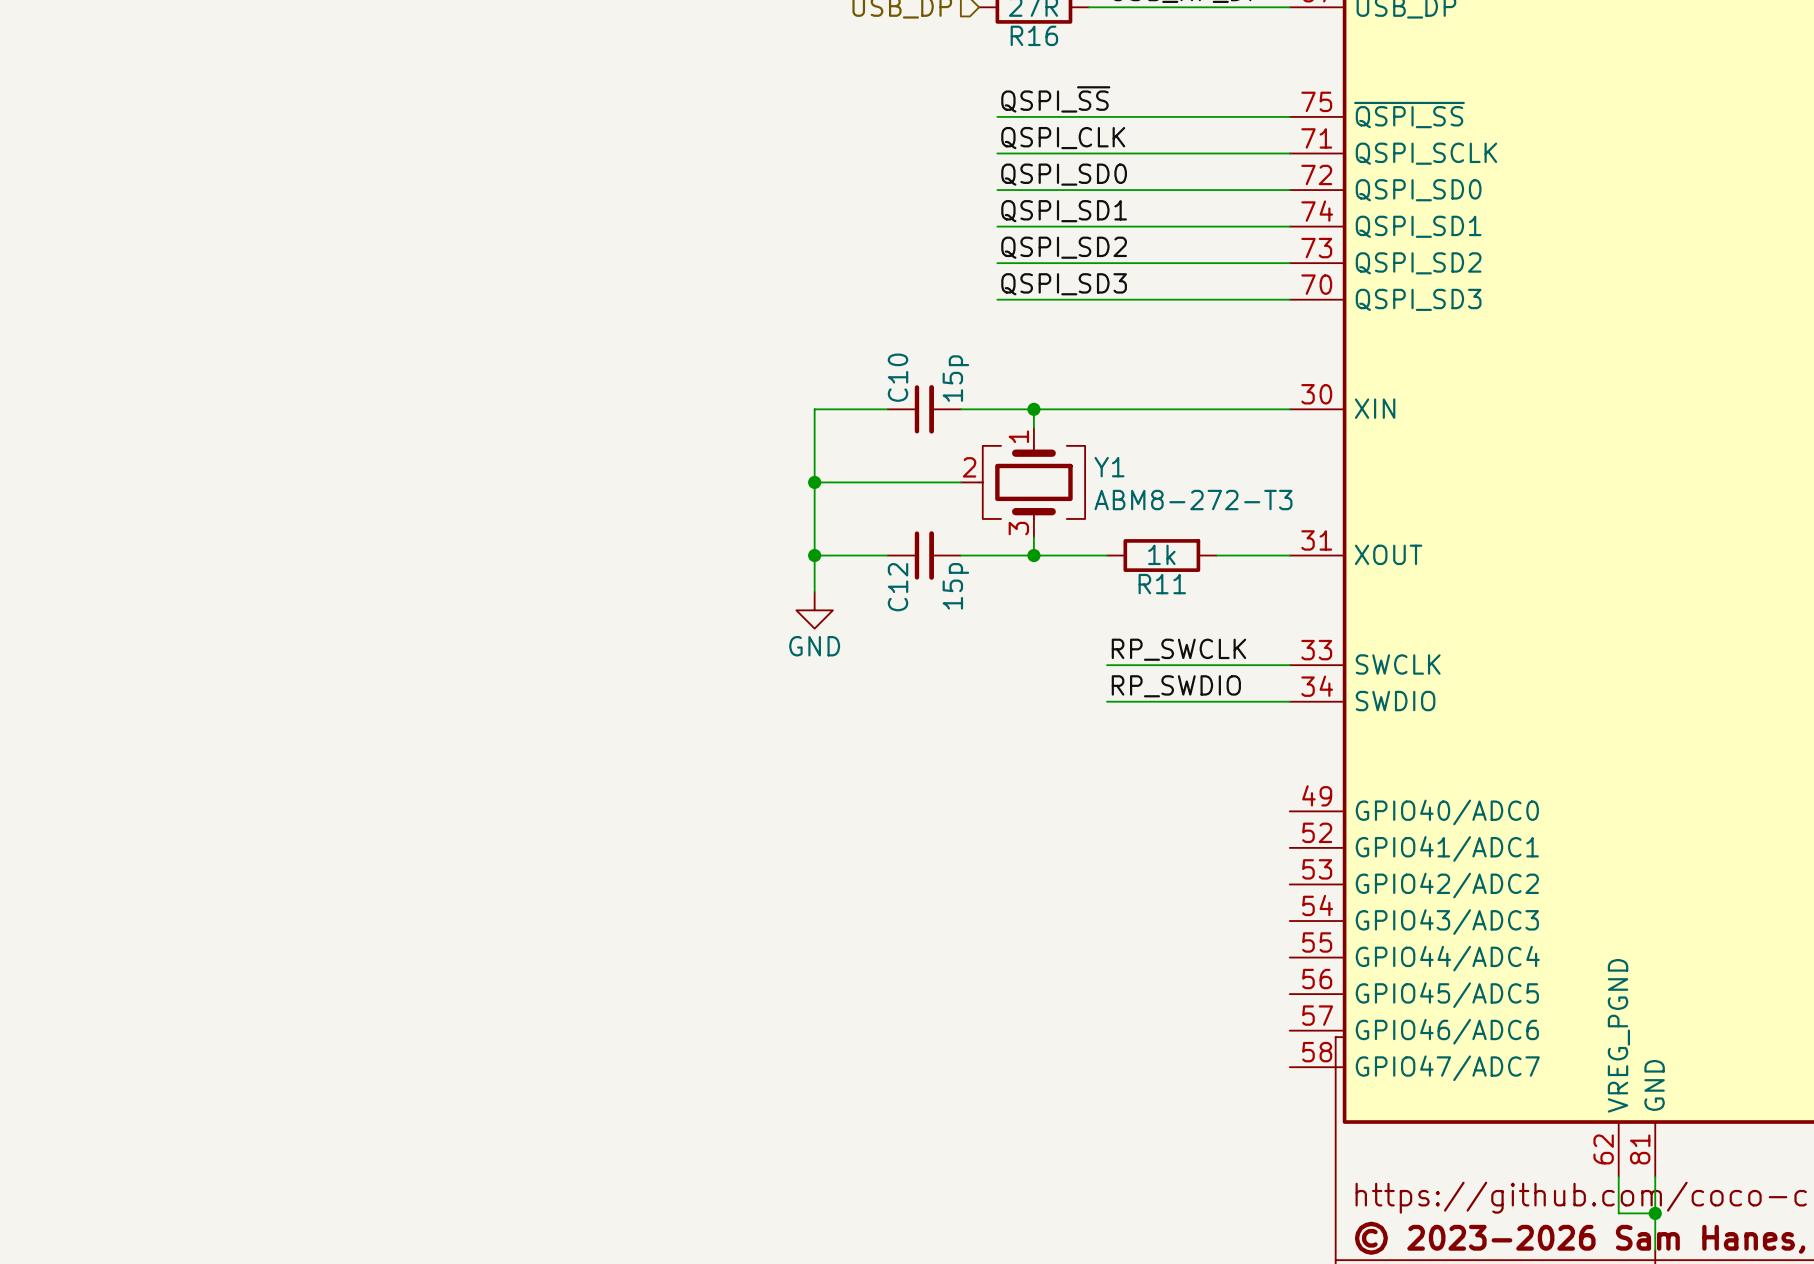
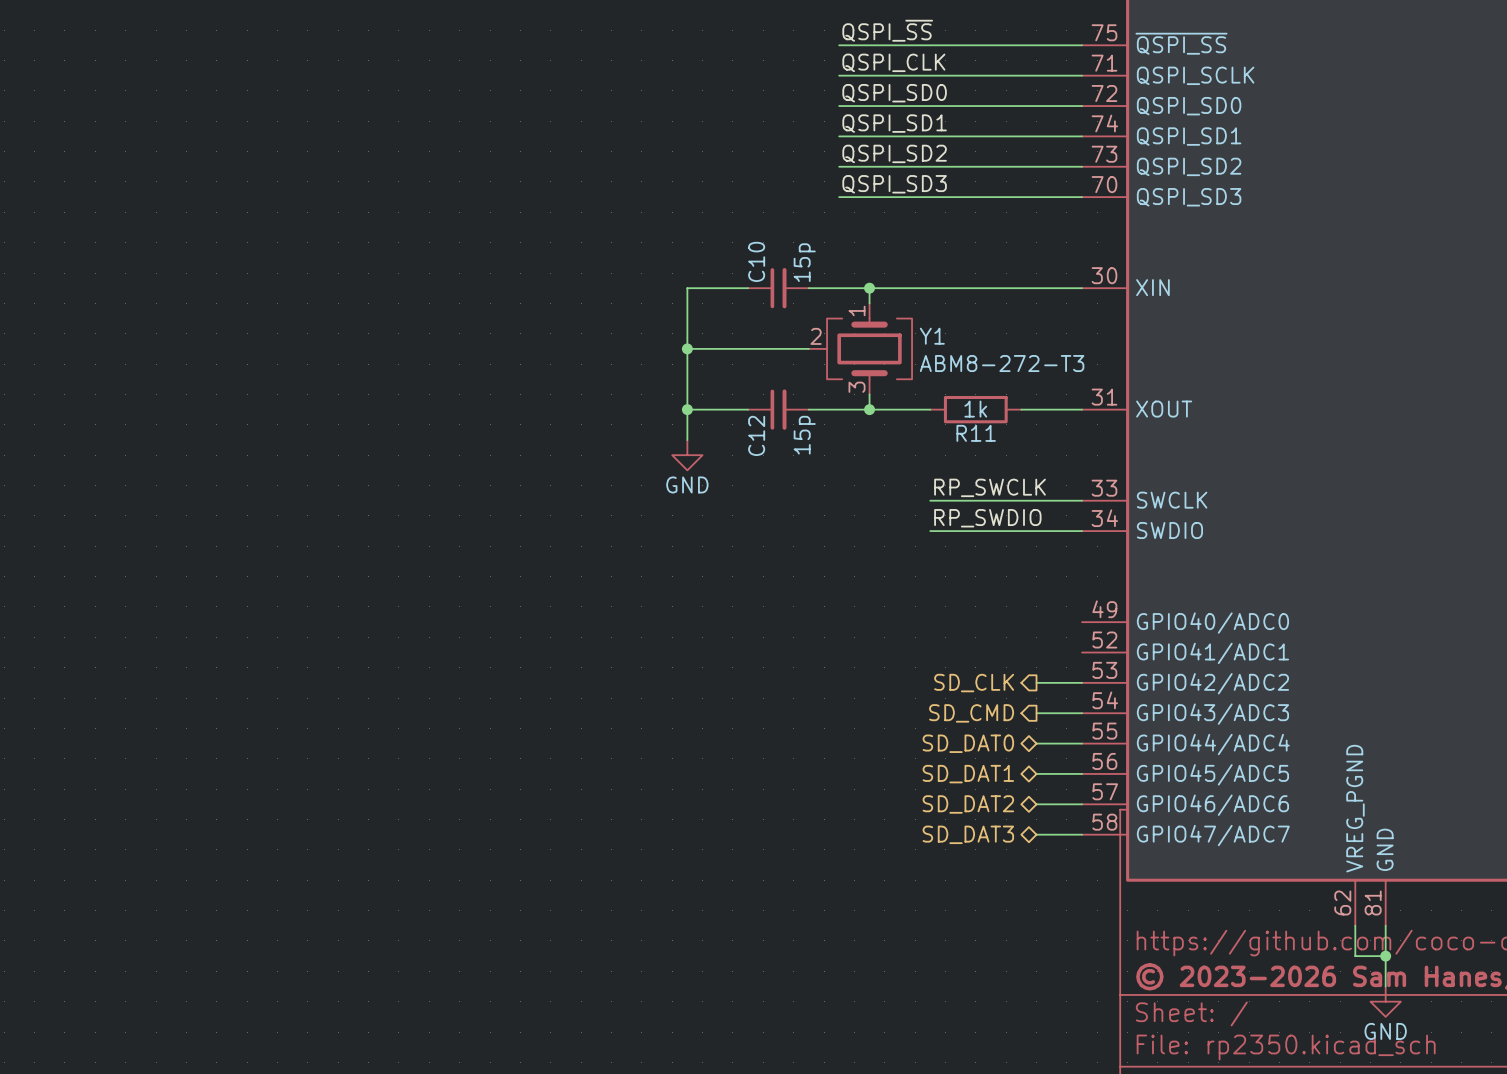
hierarchical label: none -> SD_CLK (974, 683)
wire: none -> (1036, 682) (1082, 682)
hierarchical label: none -> SD_CMD (971, 713)
wire: none -> (1036, 713) (1082, 713)
hierarchical label: none -> SD_DAT0 (968, 743)
wire: none -> (1036, 743) (1082, 743)
hierarchical label: none -> SD_DAT1 (968, 774)
wire: none -> (1036, 773) (1082, 773)
hierarchical label: none -> SD_DAT2 (968, 804)
wire: none -> (1036, 804) (1082, 804)
hierarchical label: none -> SD_DAT3 (968, 834)
wire: none -> (1036, 834) (1082, 834)

